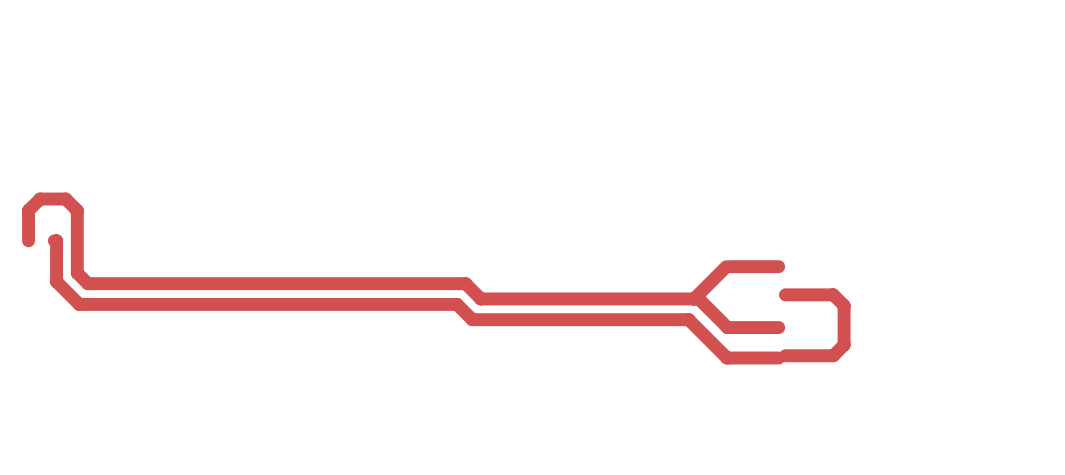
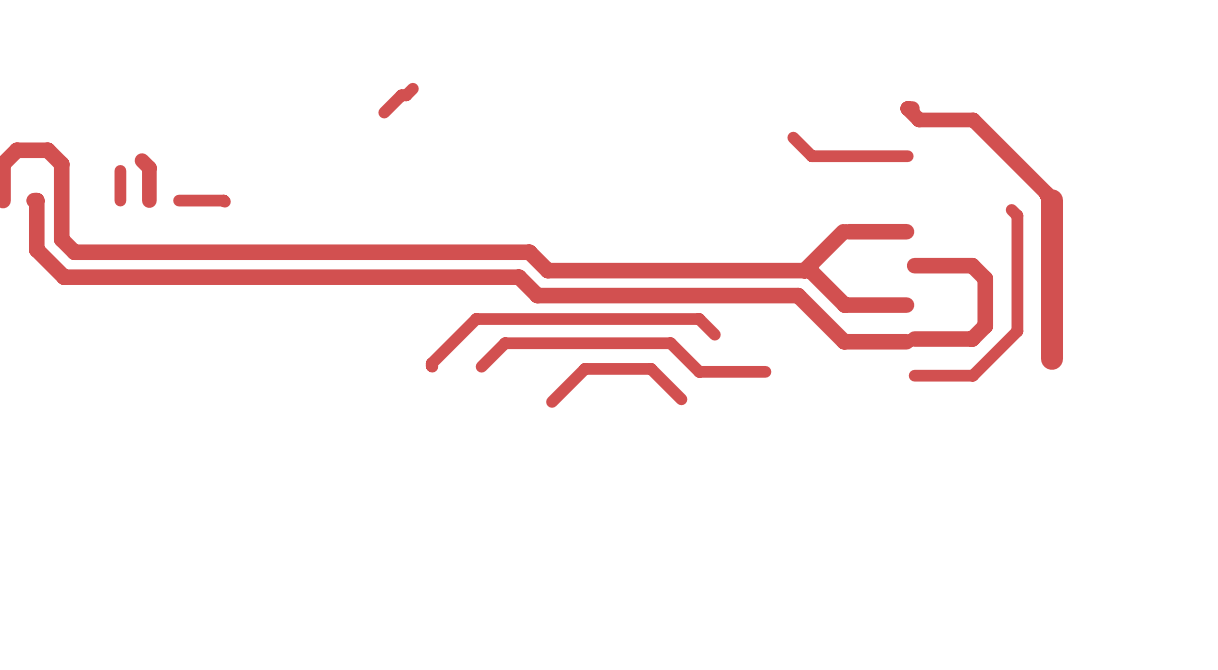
track: none -> (412, 88) (406, 95) (401, 95) (384, 112)
track: none -> (912, 108) (907, 108) (919, 119) (973, 119) (1052, 200) (1052, 358)
track: none -> (793, 137) (811, 156) (907, 156)
track: none -> (142, 160) (149, 167) (149, 200)
track: none -> (120, 170) (120, 200)
track: none -> (179, 200) (224, 201)
track: none -> (1011, 209) (1017, 215) (1017, 331) (972, 375) (914, 375)
track: none -> (714, 334) (699, 319) (476, 319) (431, 363) (431, 366)
track: none -> (481, 366) (505, 343) (670, 343) (699, 371) (765, 371)
track: none -> (681, 399) (651, 368) (585, 368) (552, 401)

